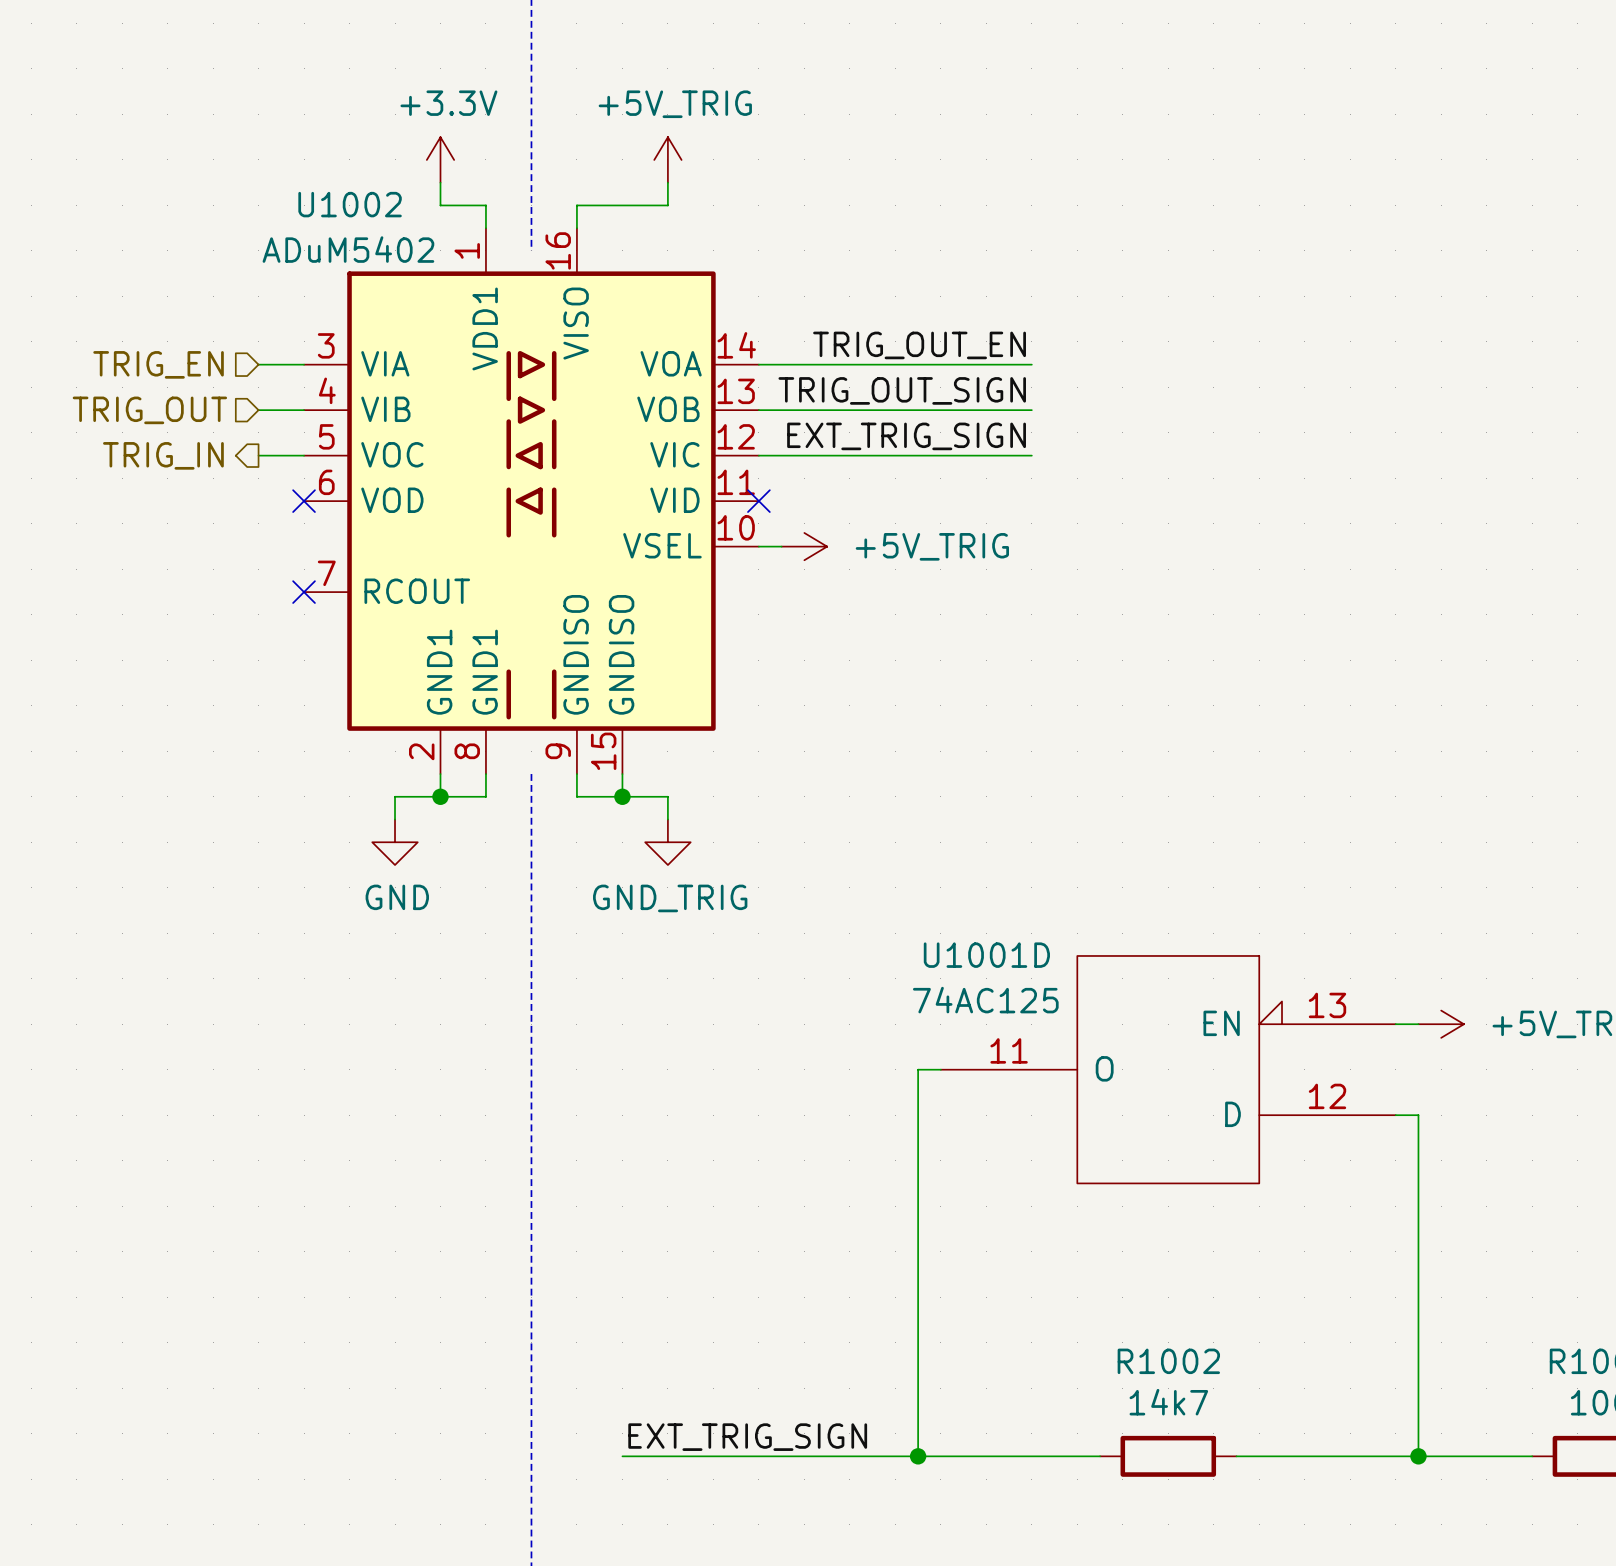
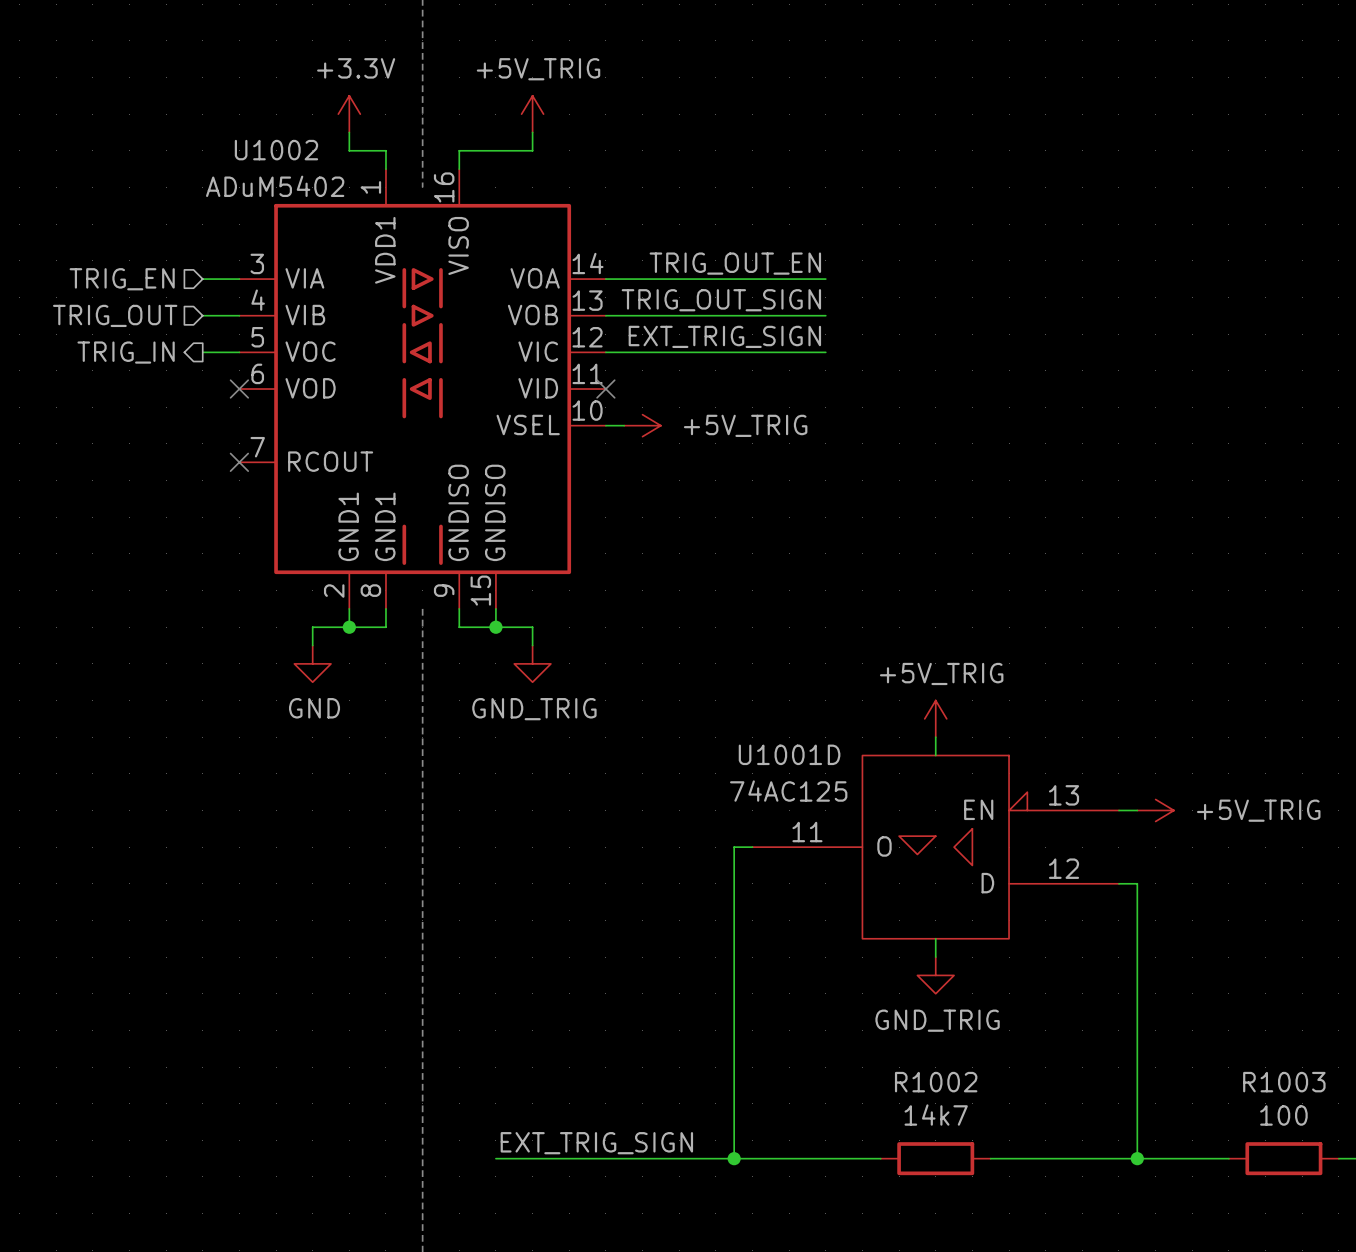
power symbol: none -> +5V_TRIG (935, 718)
wire: none -> (935, 737) (935, 755)
U1001D symbol: [940, 955, 1396, 1184] -> [752, 755, 1119, 939]
wire: none -> (935, 938) (935, 957)
power symbol: none -> GND_TRIG (935, 975)

